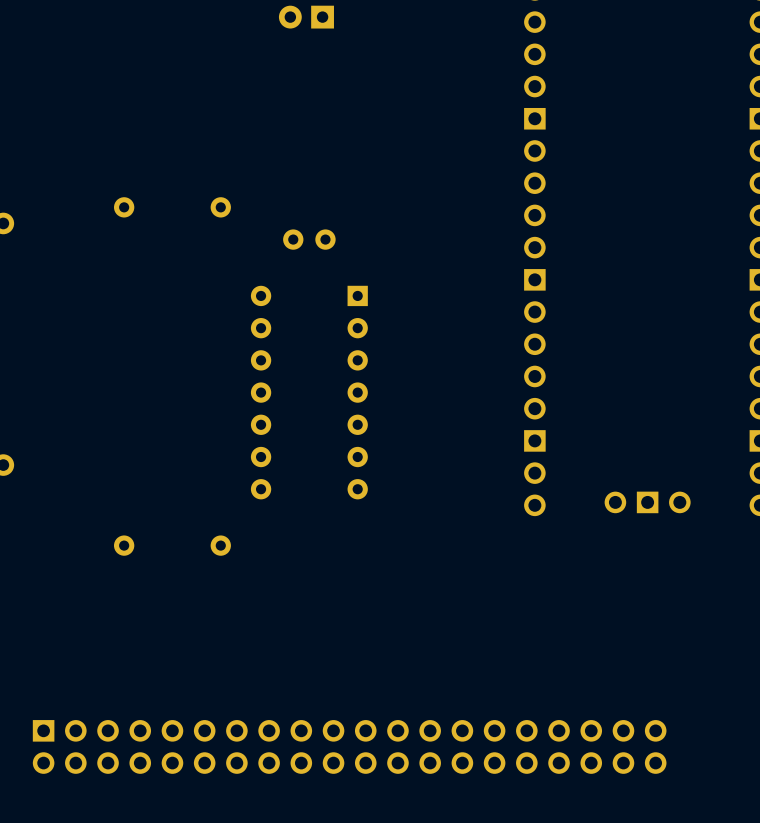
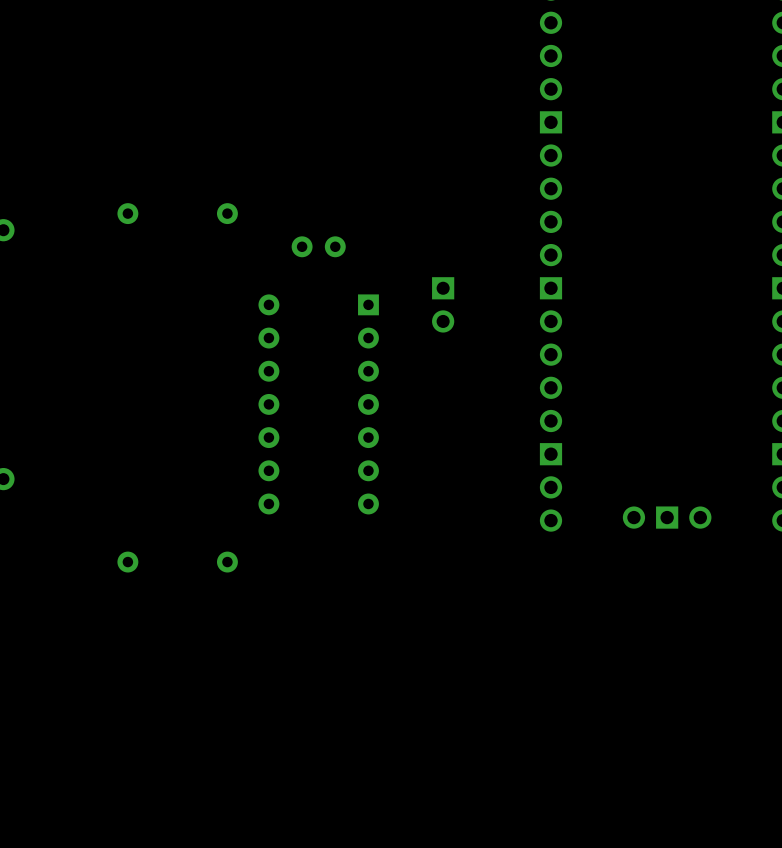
part: (306, 17) -> none
part: none -> (443, 304)
part: (349, 746) -> none

